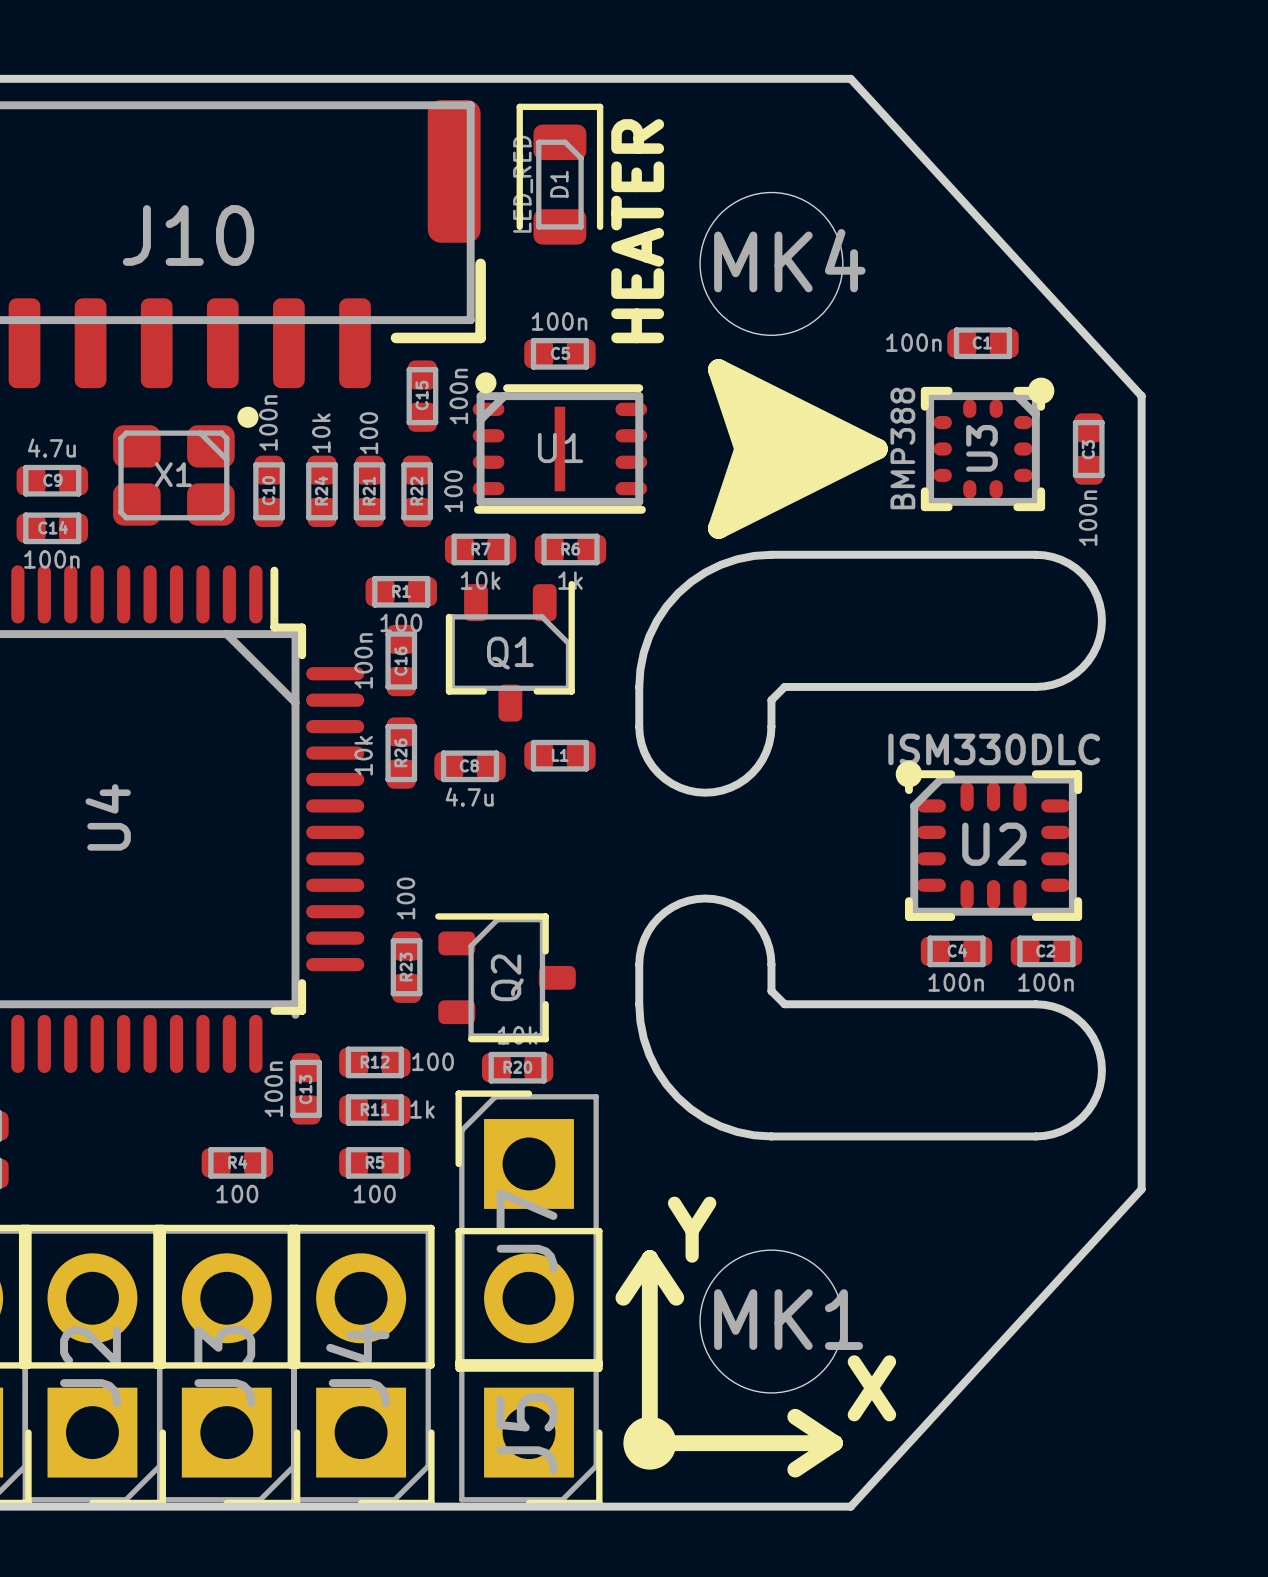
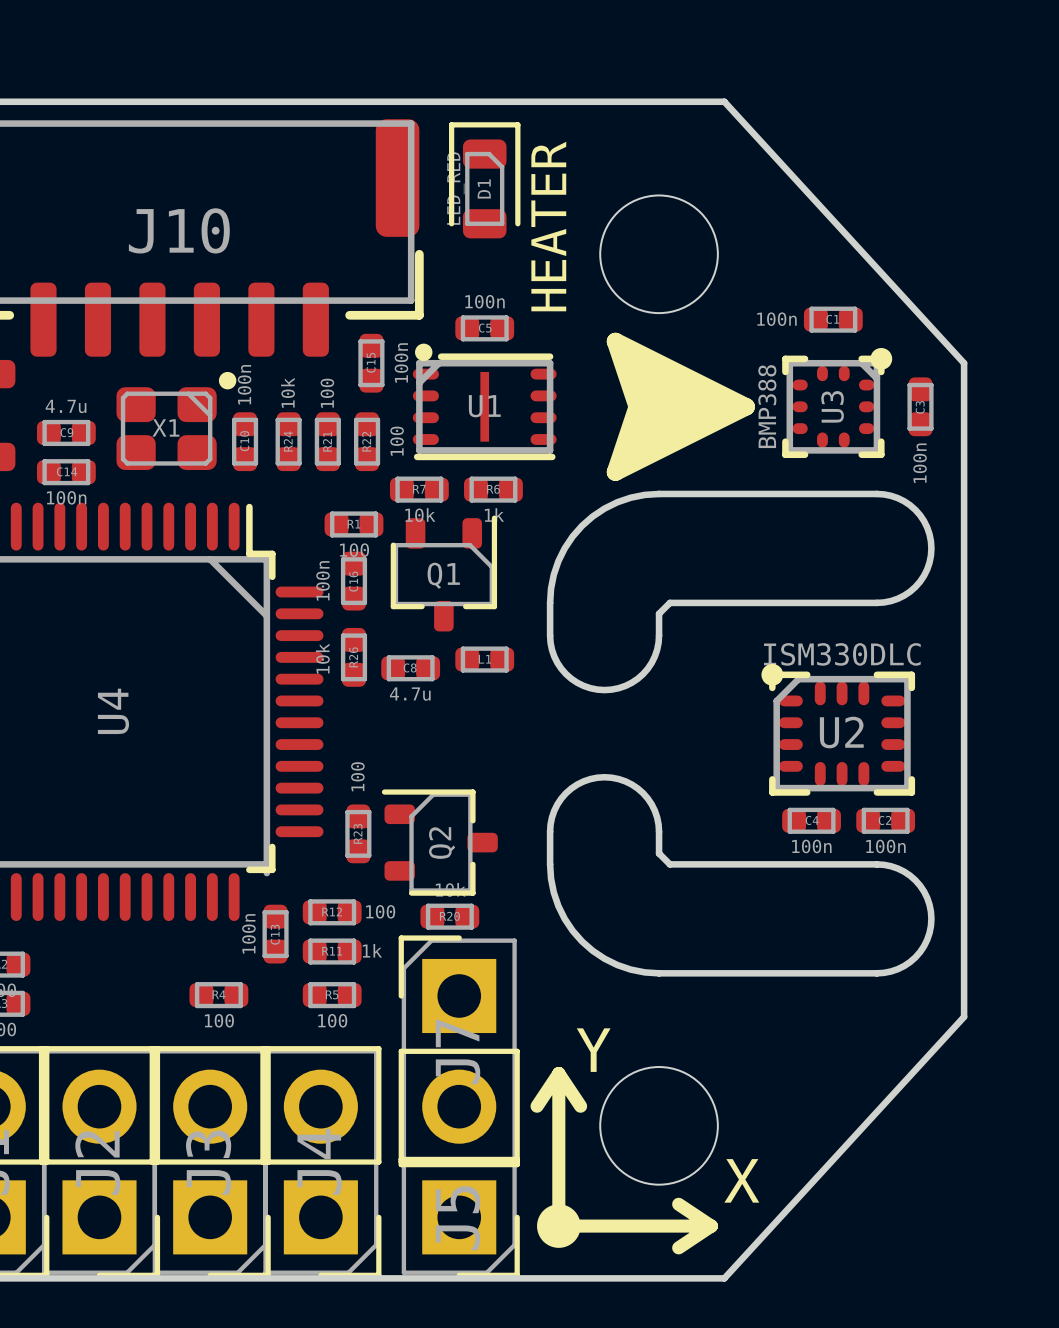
MK4 name: MK4 (789, 260) -> none
MK1 name: MK1 (788, 1319) -> none

